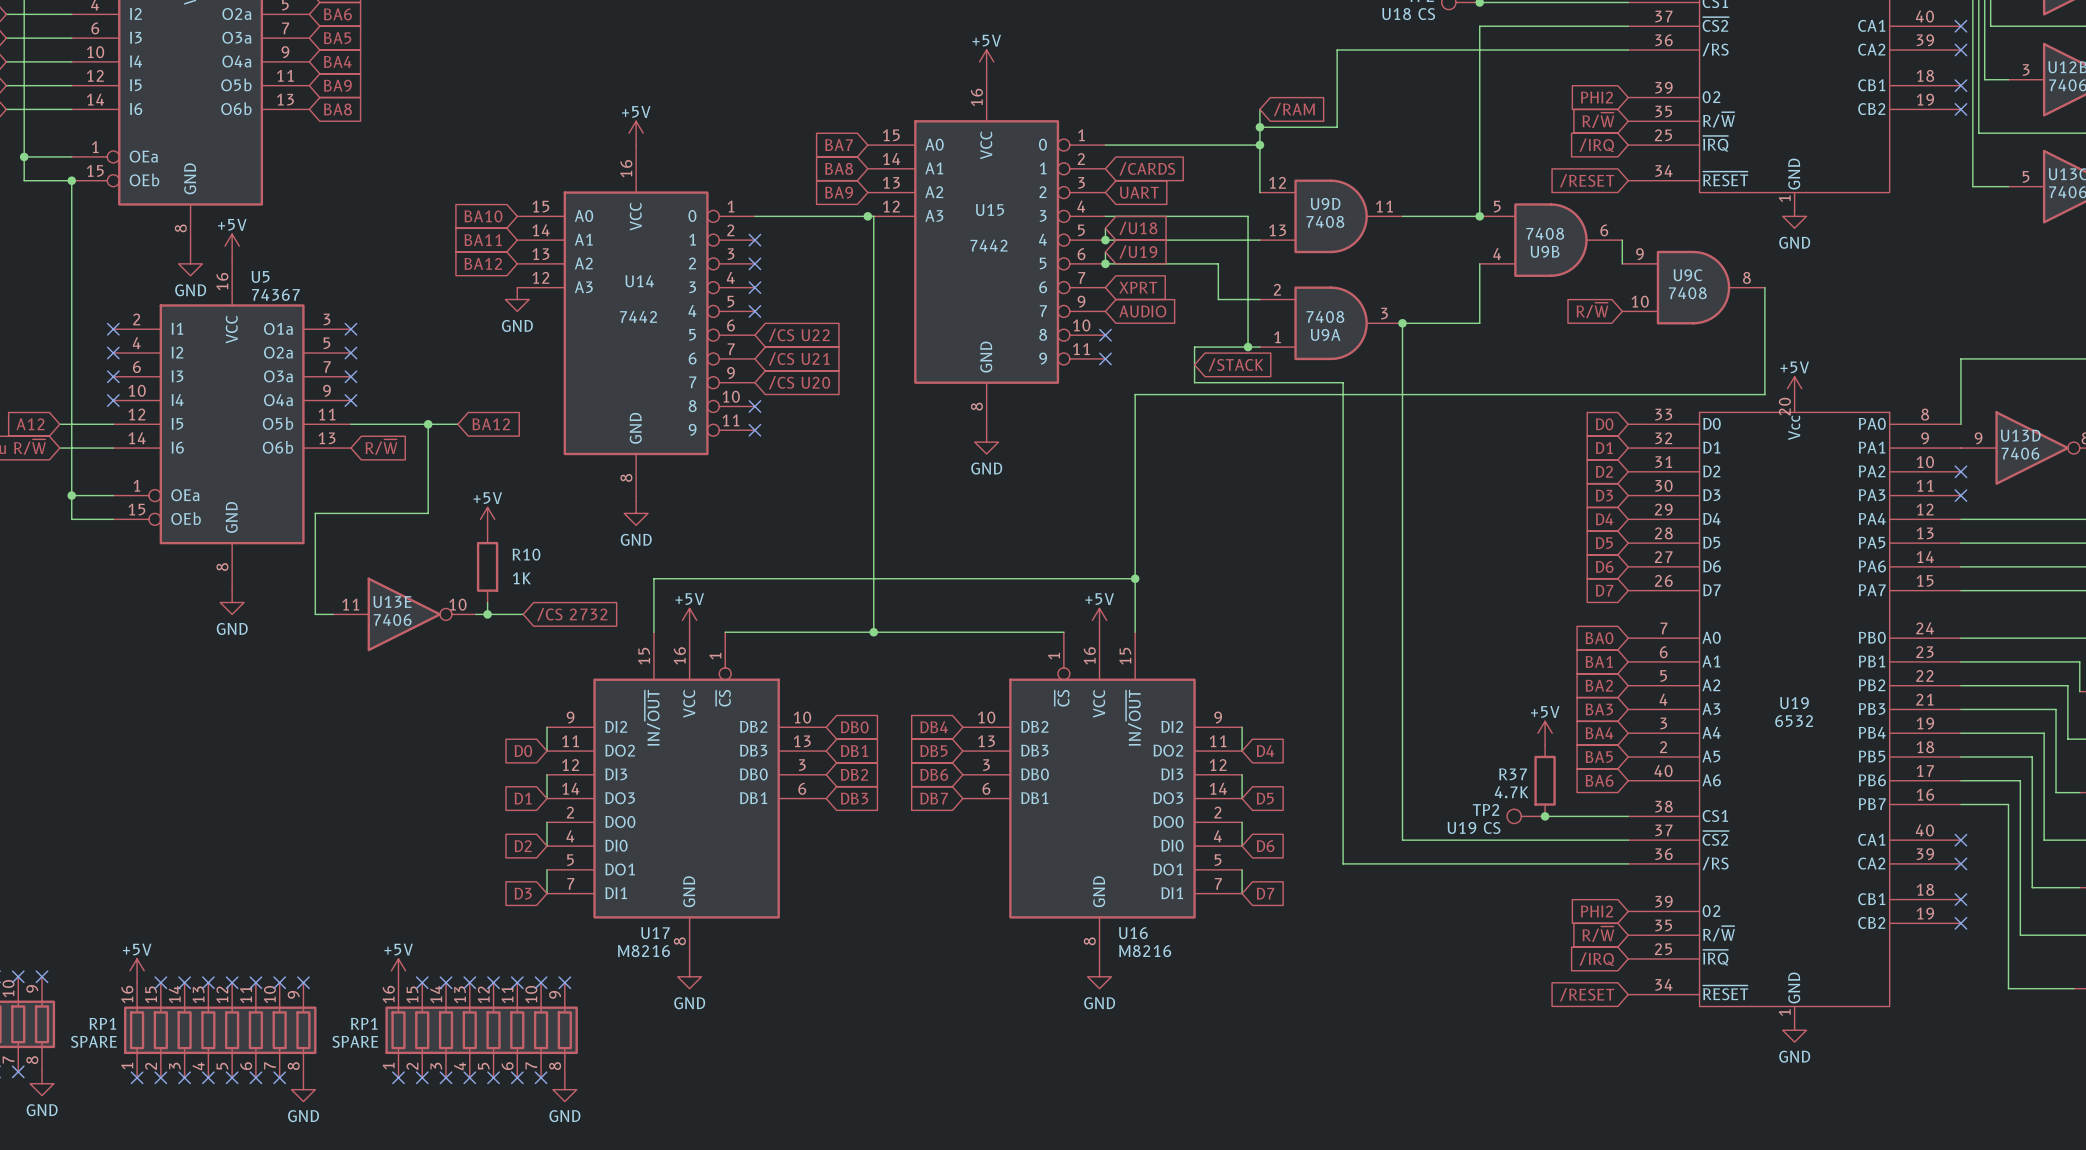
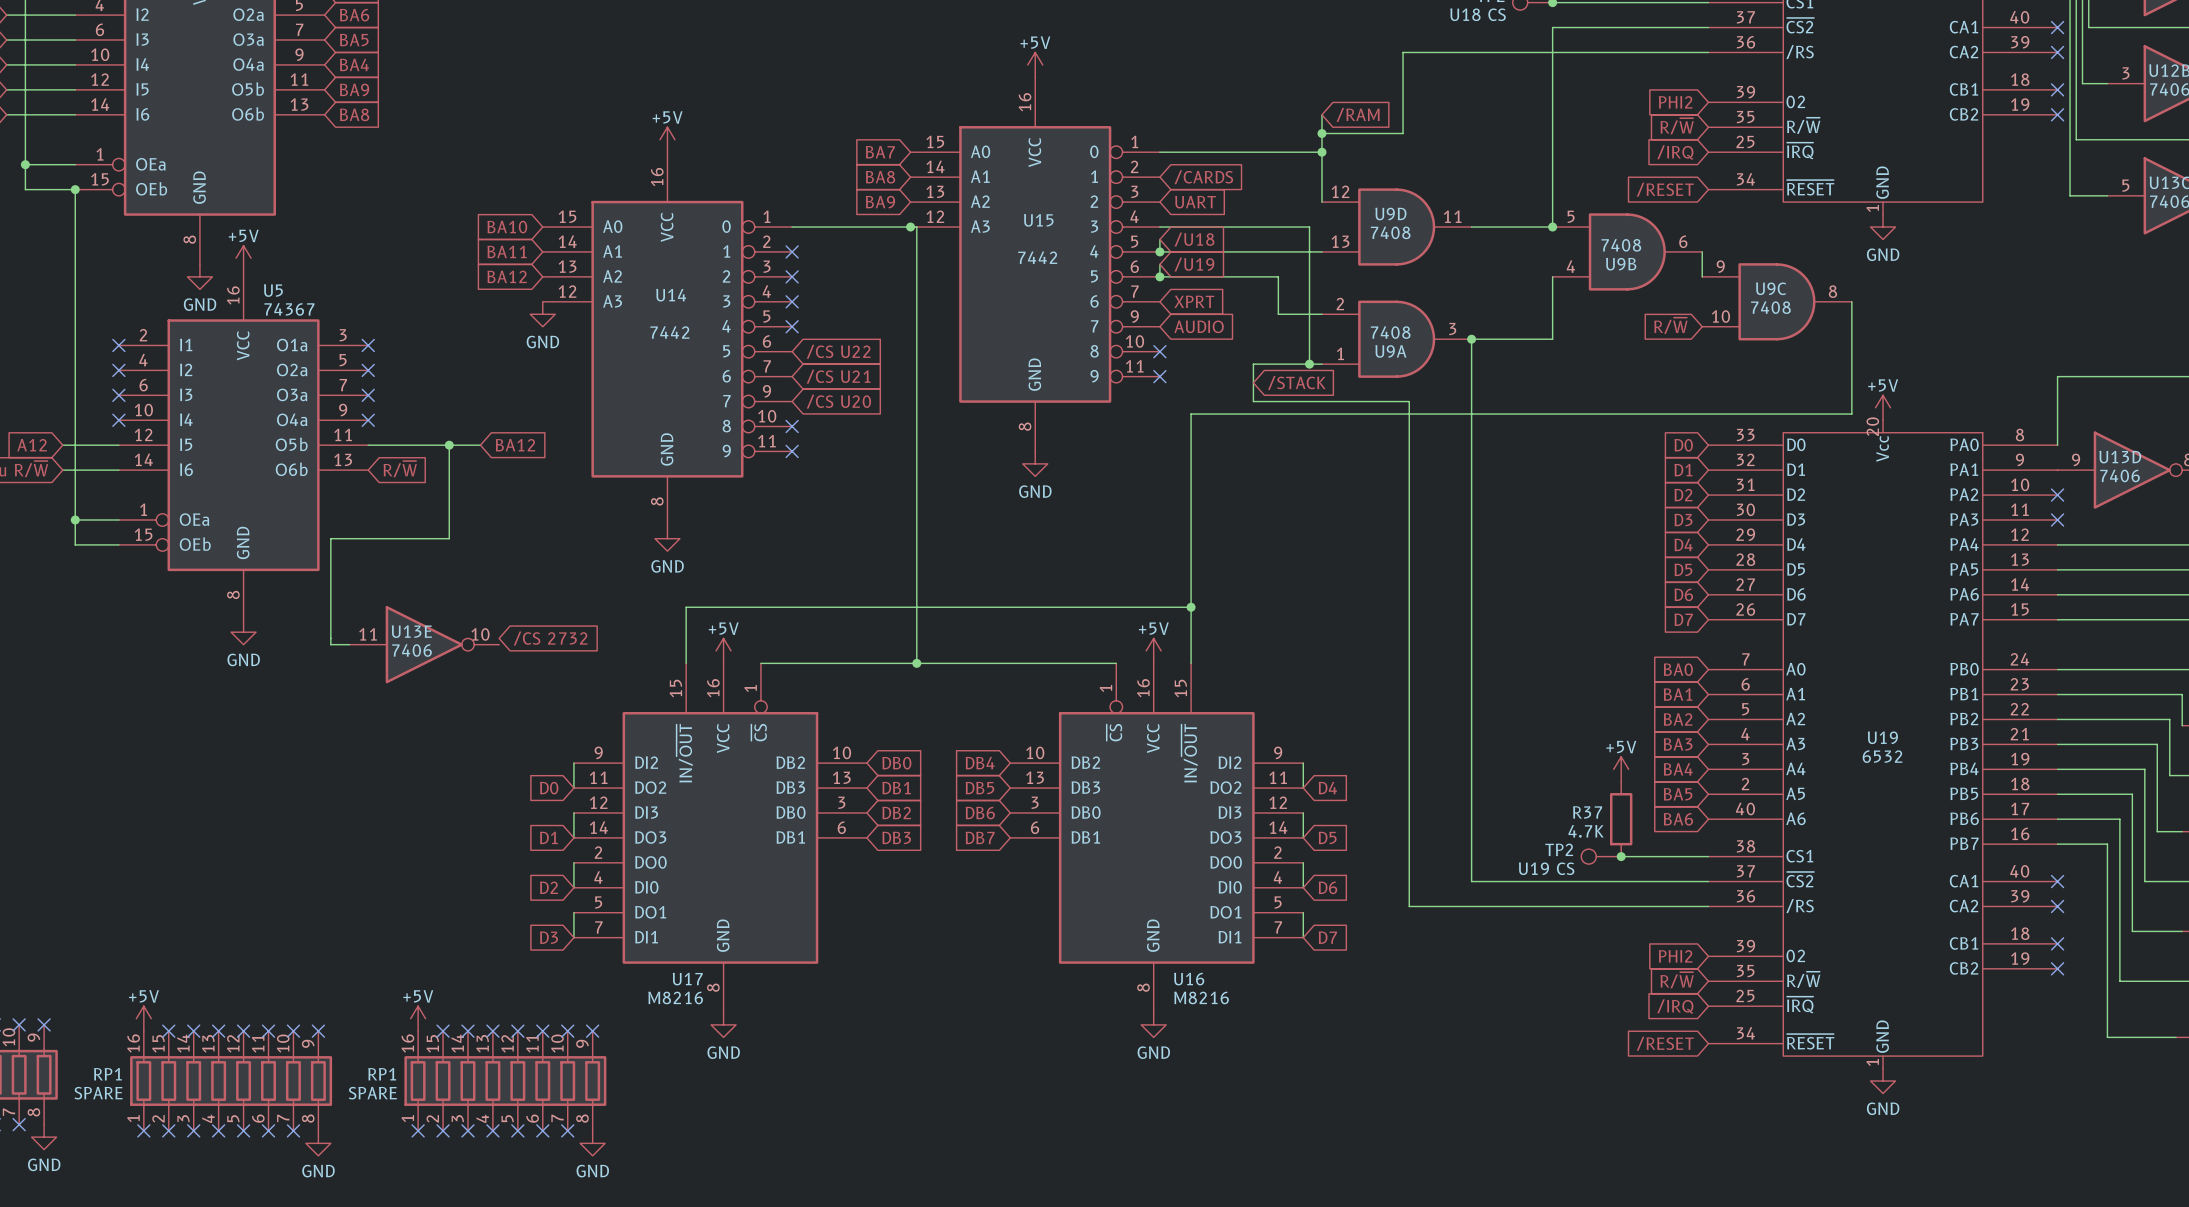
power symbol: +5V (487, 519) -> none
R10: 1K (487, 566) -> none
wire: (487, 602) (487, 614) -> none
wire: (475, 614) (523, 614) -> none
junction: (487, 614) -> none
global label position: /CS 2732 (572, 614) -> /CS 2732 (550, 638)

